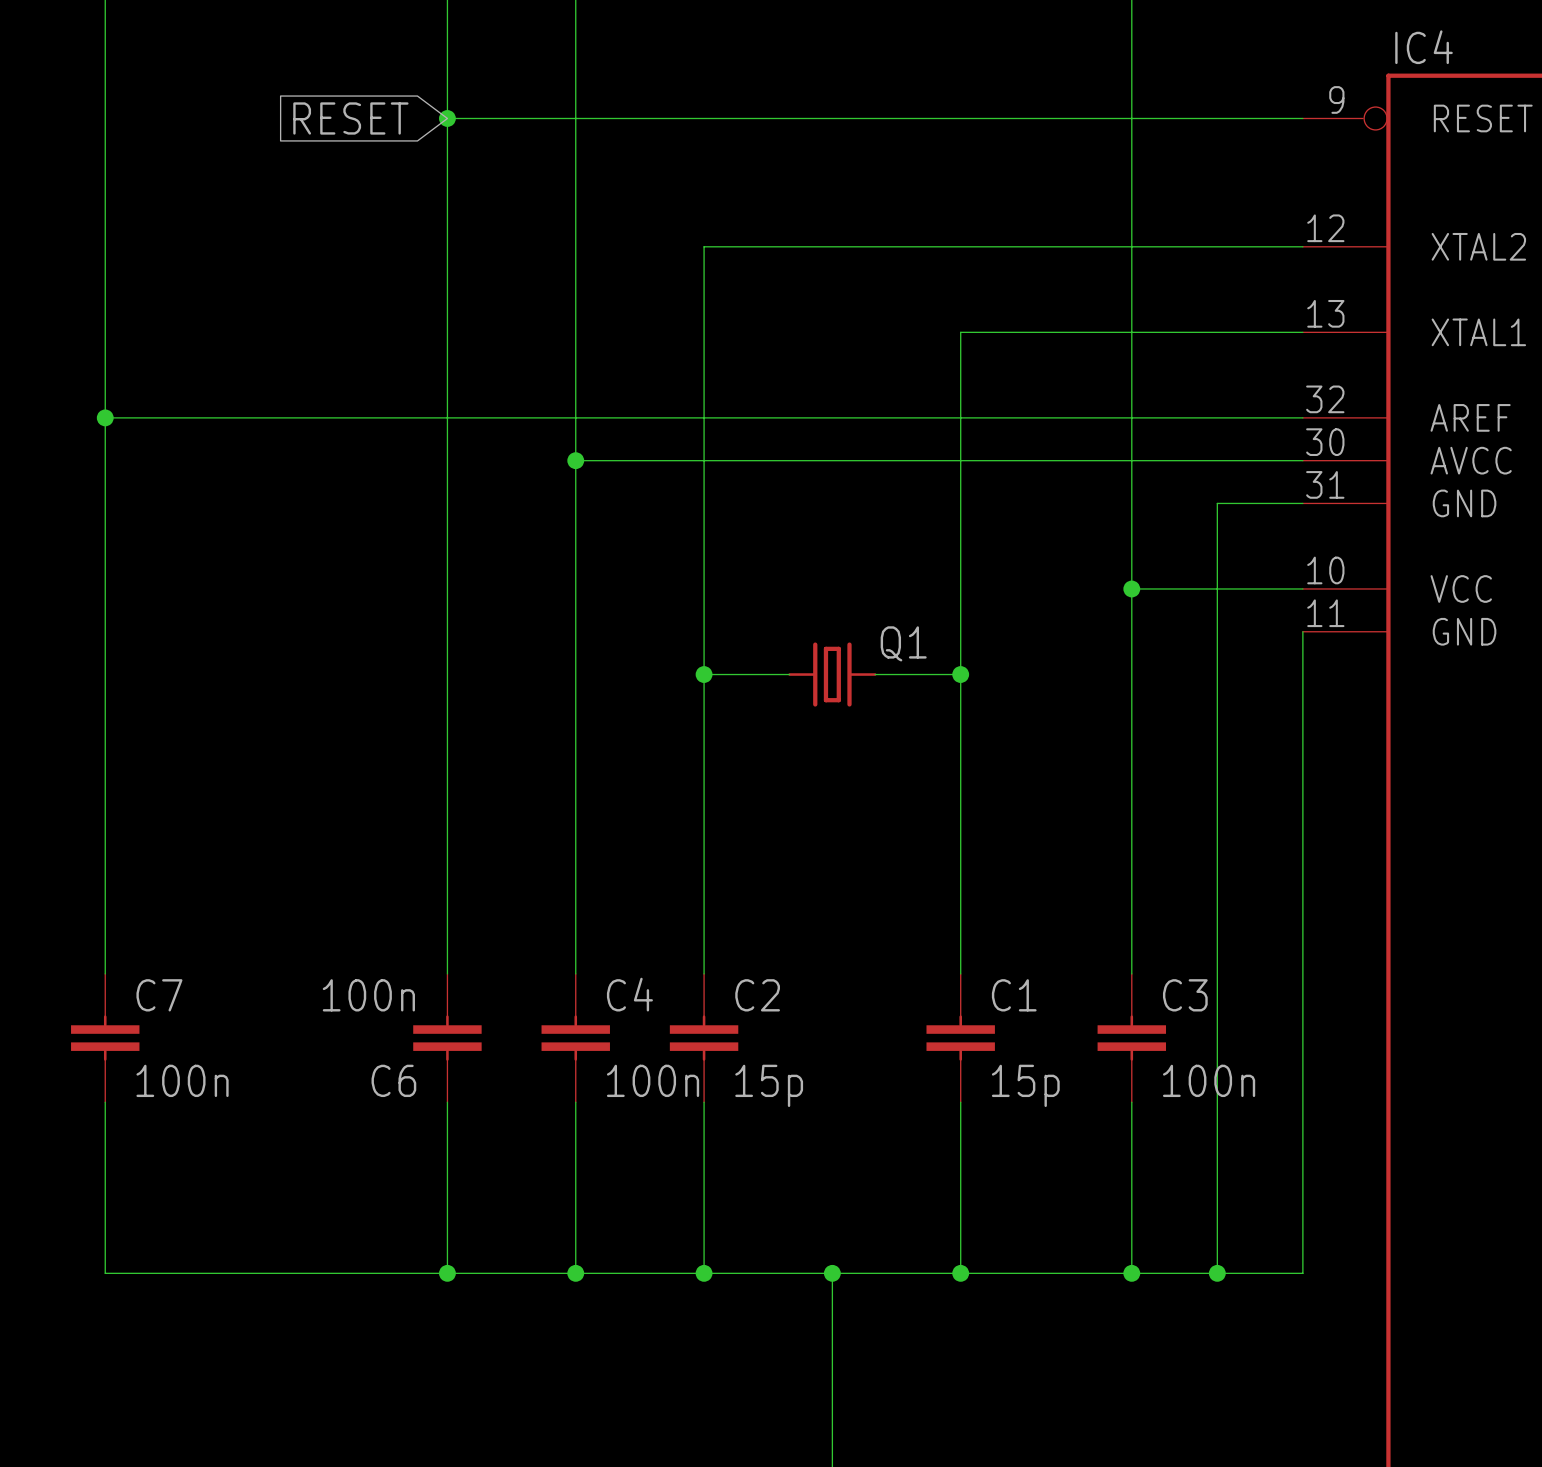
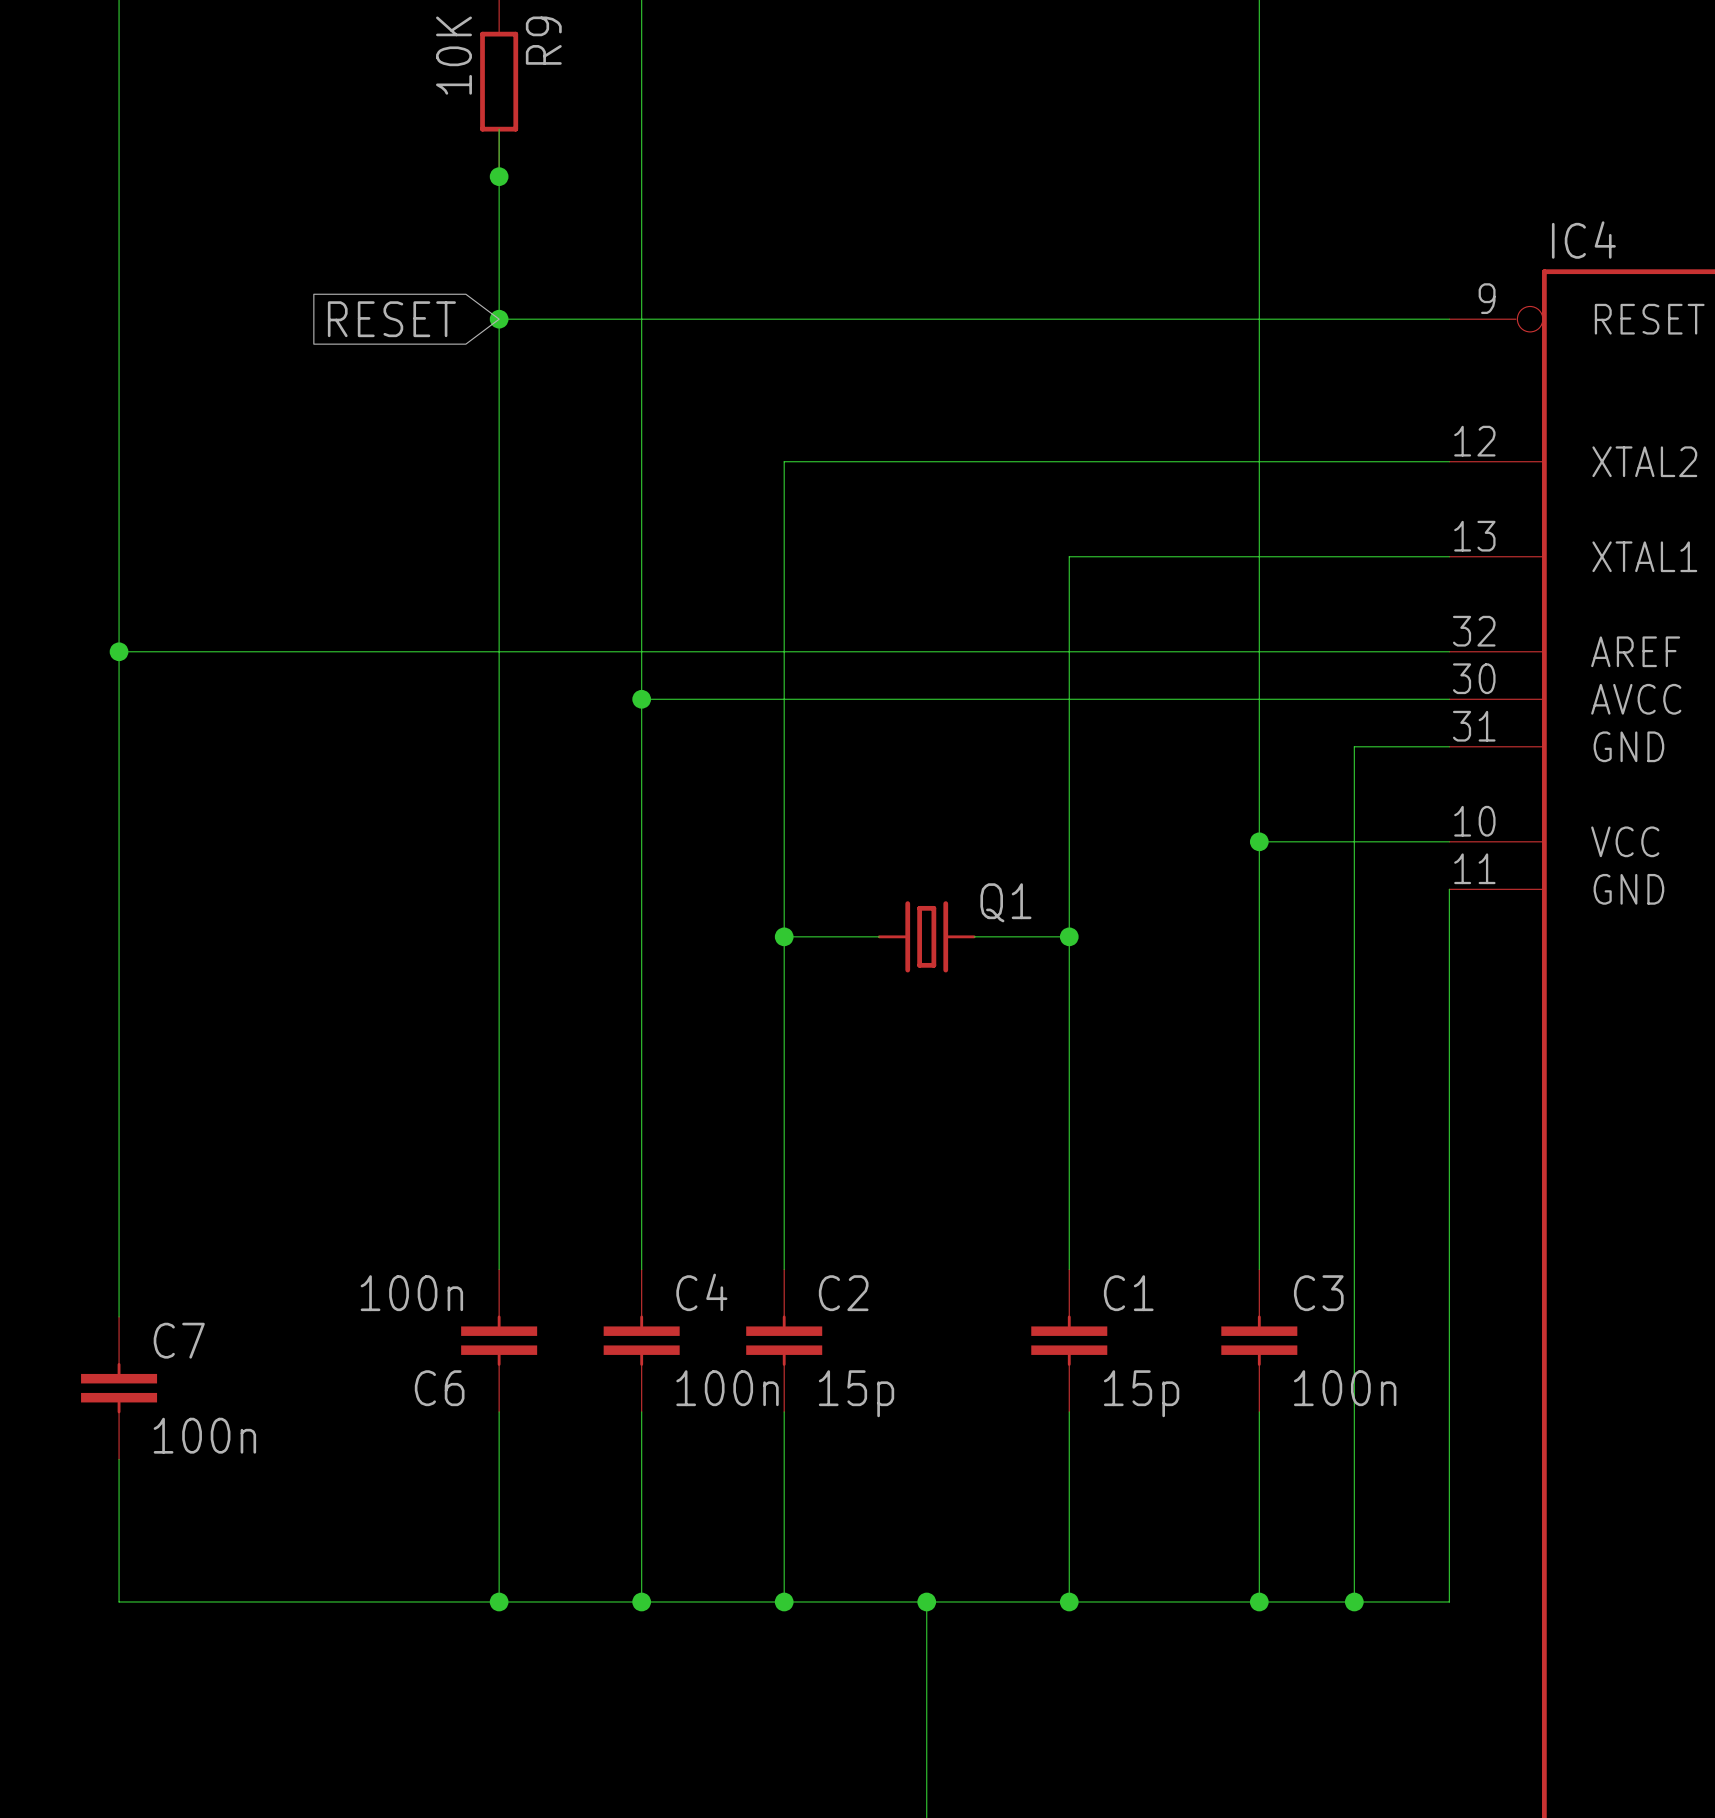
C7 position: (105, 1038) -> (119, 1388)

